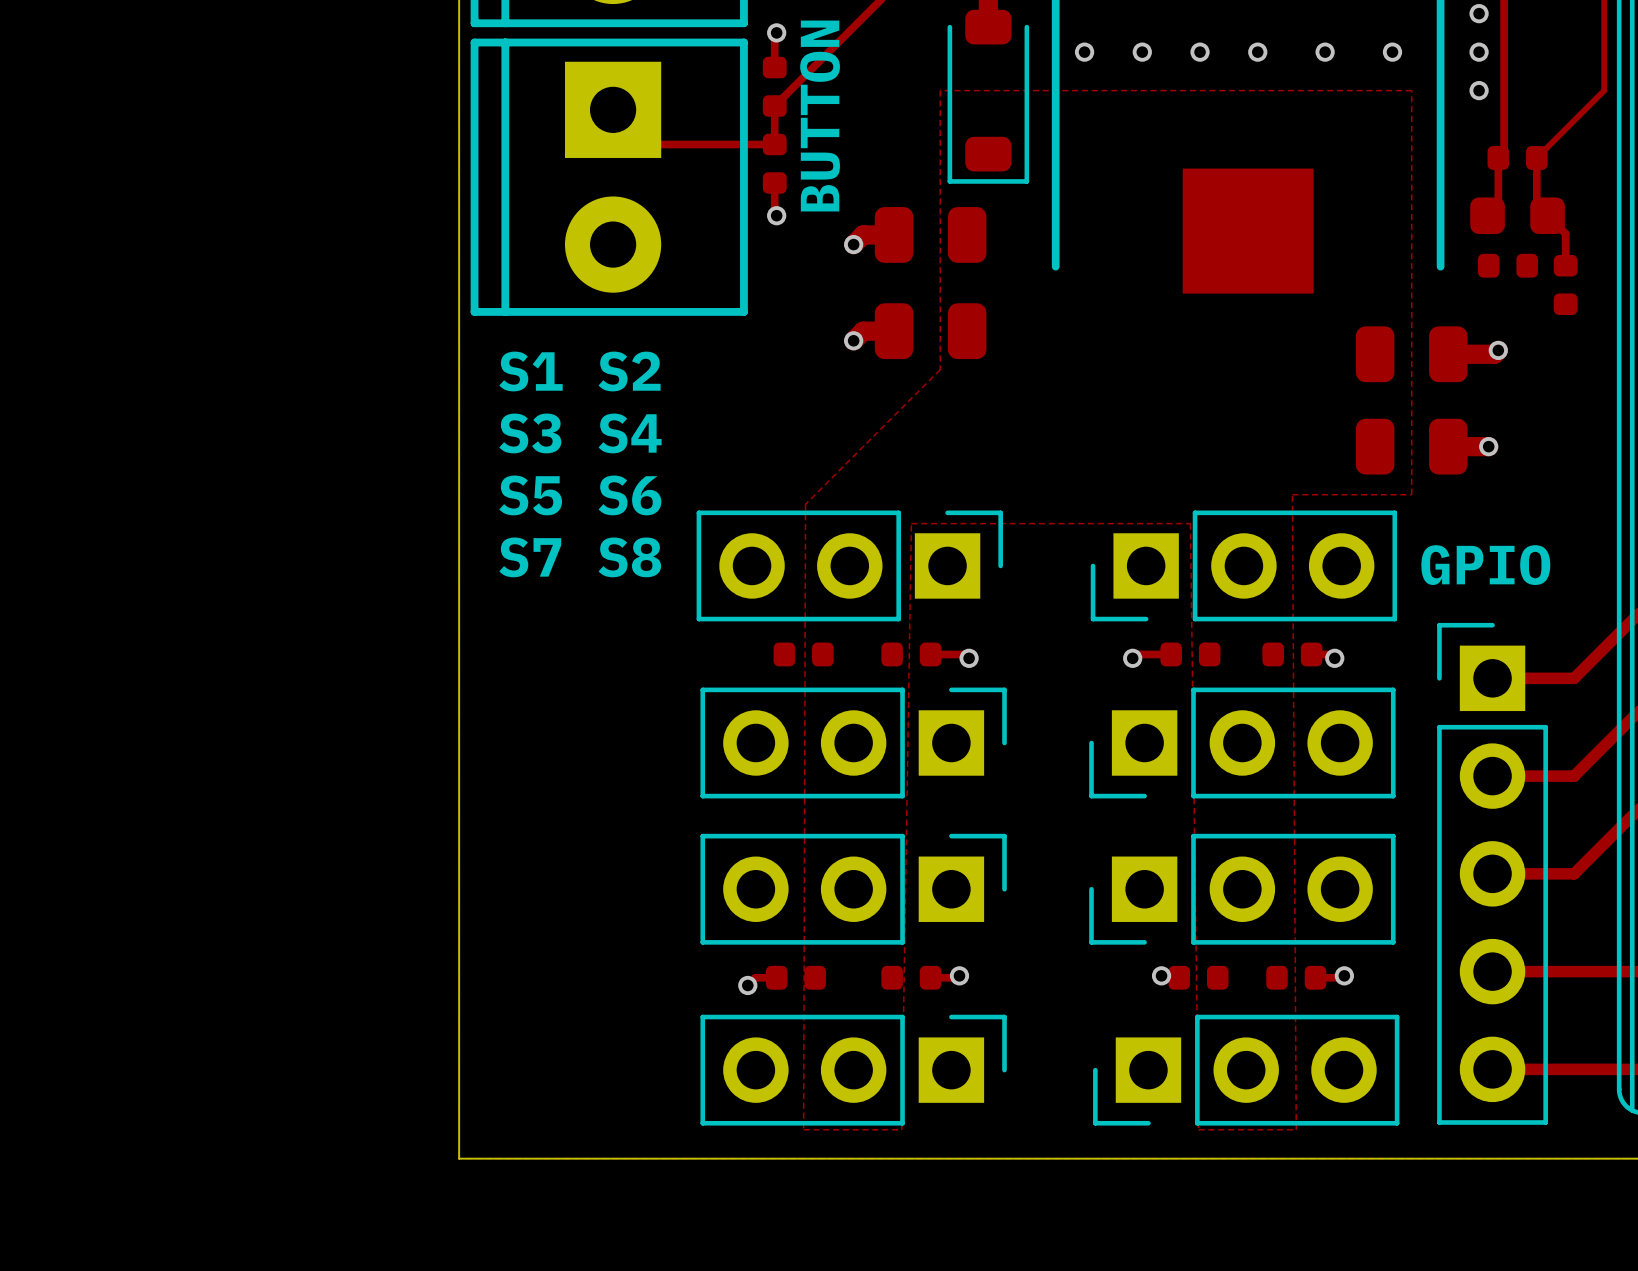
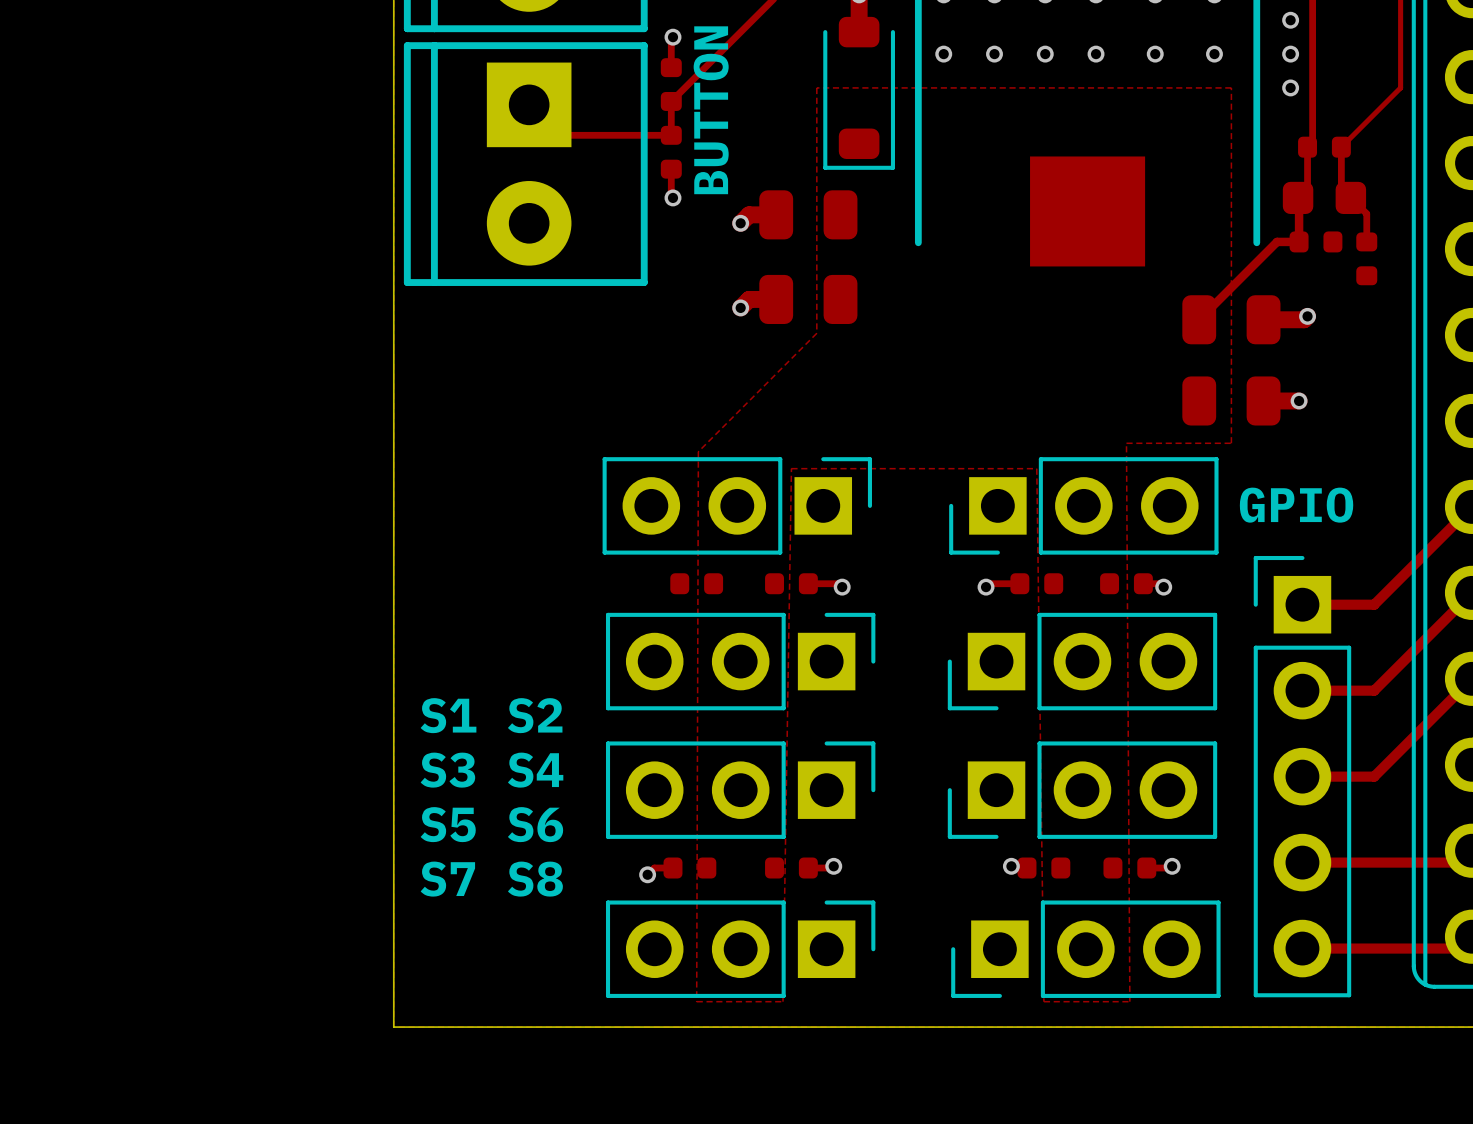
track: none -> (1298, 197) (1299, 241) (1277, 241) (1199, 319)
text position: S1 S2 (579, 371) -> S1 S2 (491, 715)
text position: S3 S4 (580, 433) -> S3 S4 (492, 770)
text position: S5 S6 (580, 495) -> S5 S6 (491, 824)
text position: S7 S8 (580, 557) -> S7 S8 (491, 879)

